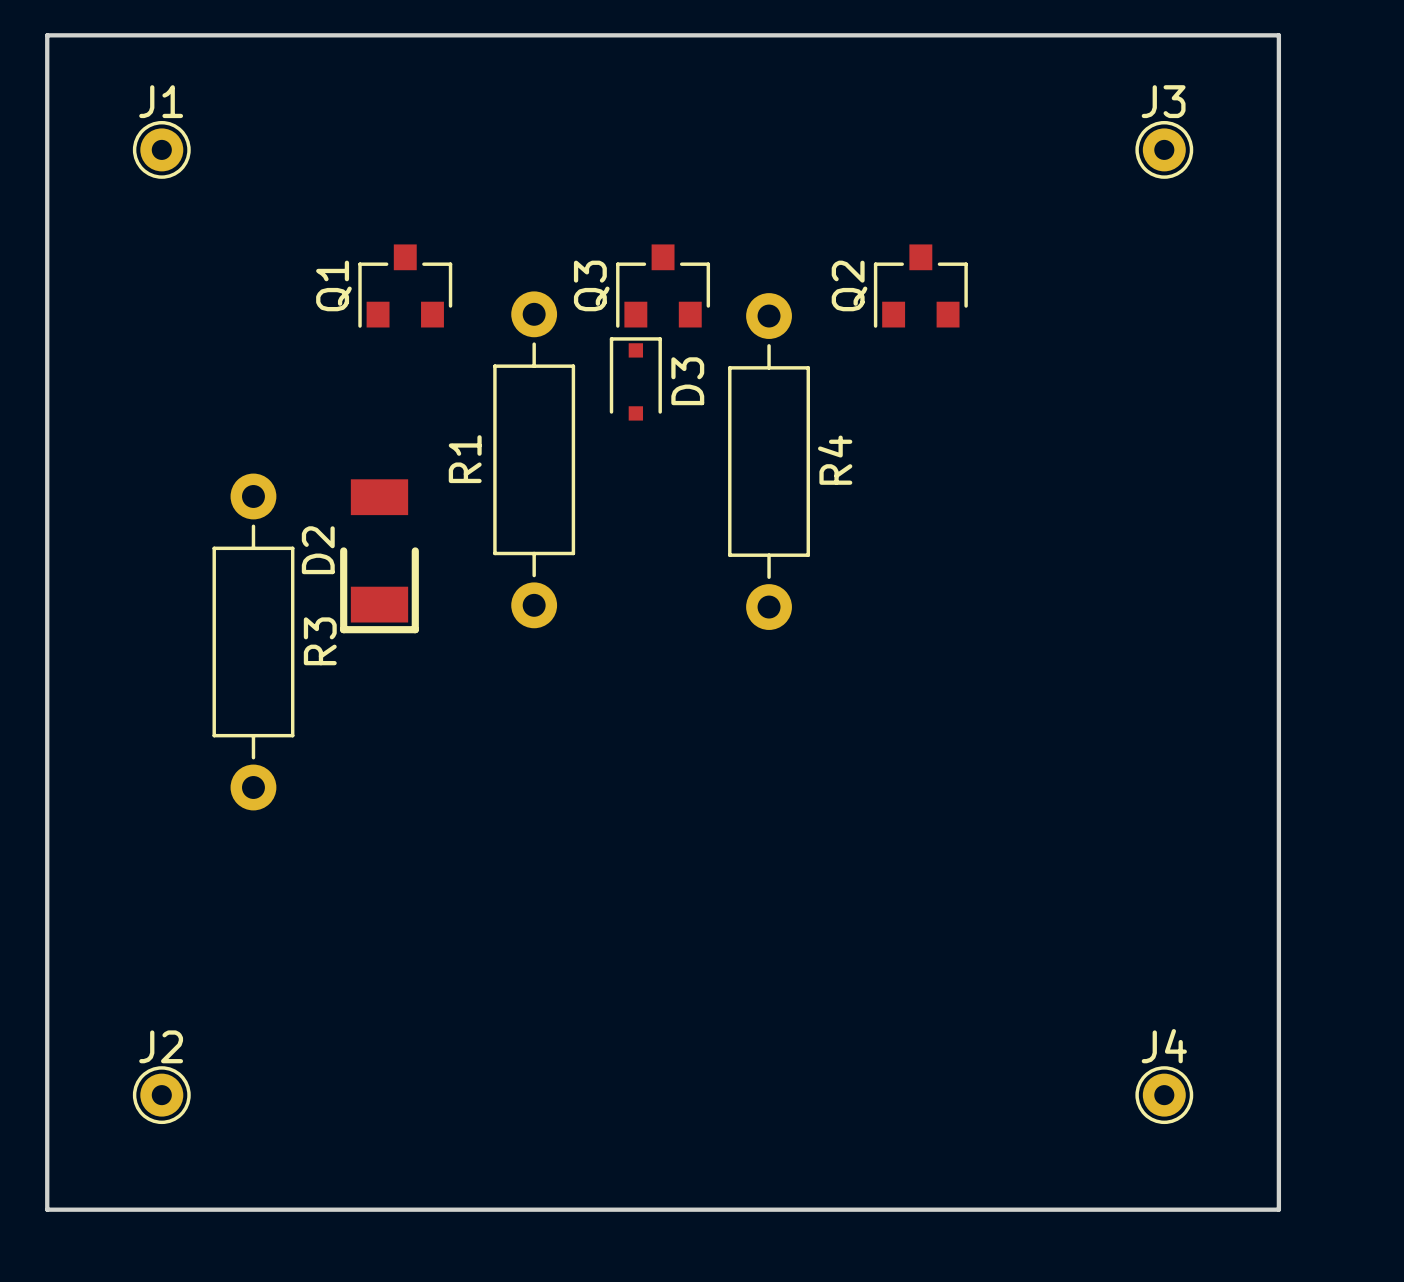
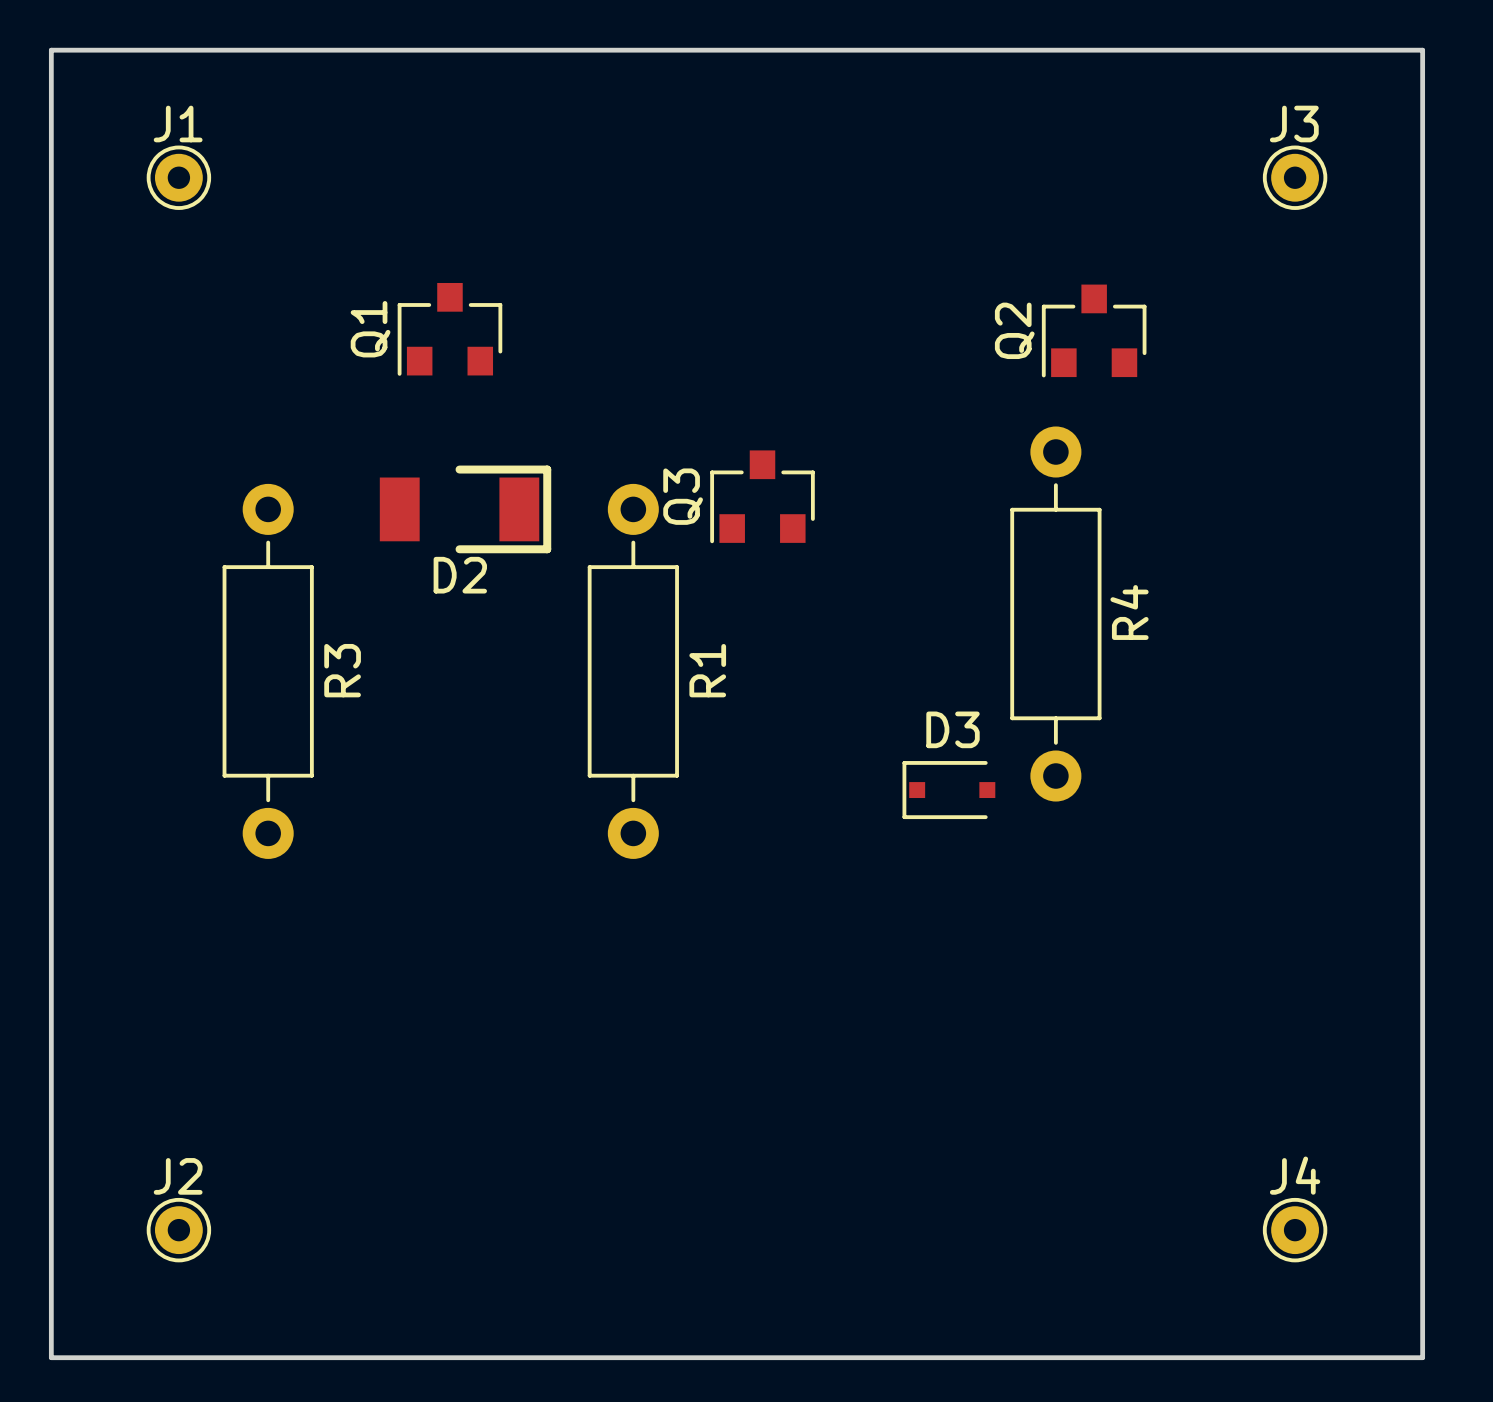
Q3 position: (663, 286) -> (762, 496)
Q2 position: (920, 286) -> (1094, 330)
D3 rotation: 0° (635, 378) -> 90° counterclockwise (948, 790)
D3 position: (635, 378) -> (948, 790)
R1 name position: R1 (465, 459) -> R1 (707, 670)
R1 position: (534, 459) -> (633, 671)
R4 position: (769, 461) -> (1055, 614)
D2 rotation: 0° (379, 556) -> 90° counterclockwise (465, 509)
D2 position: (379, 556) -> (465, 509)
R3 position: (253, 641) -> (268, 671)

